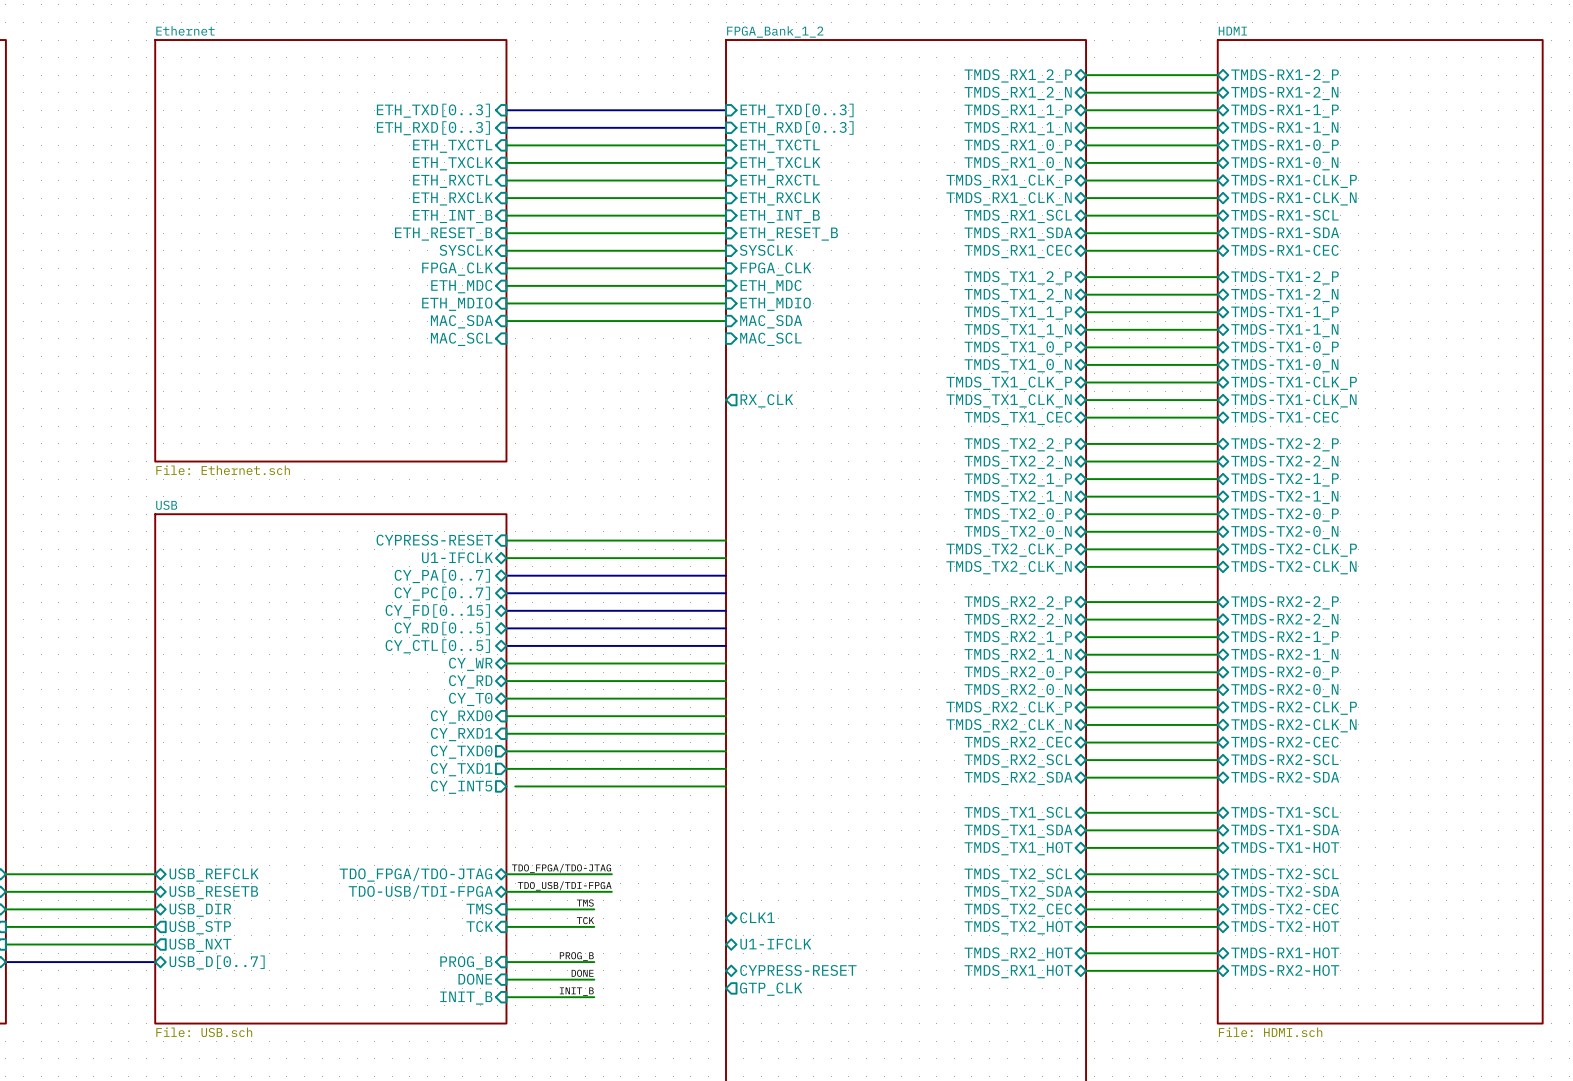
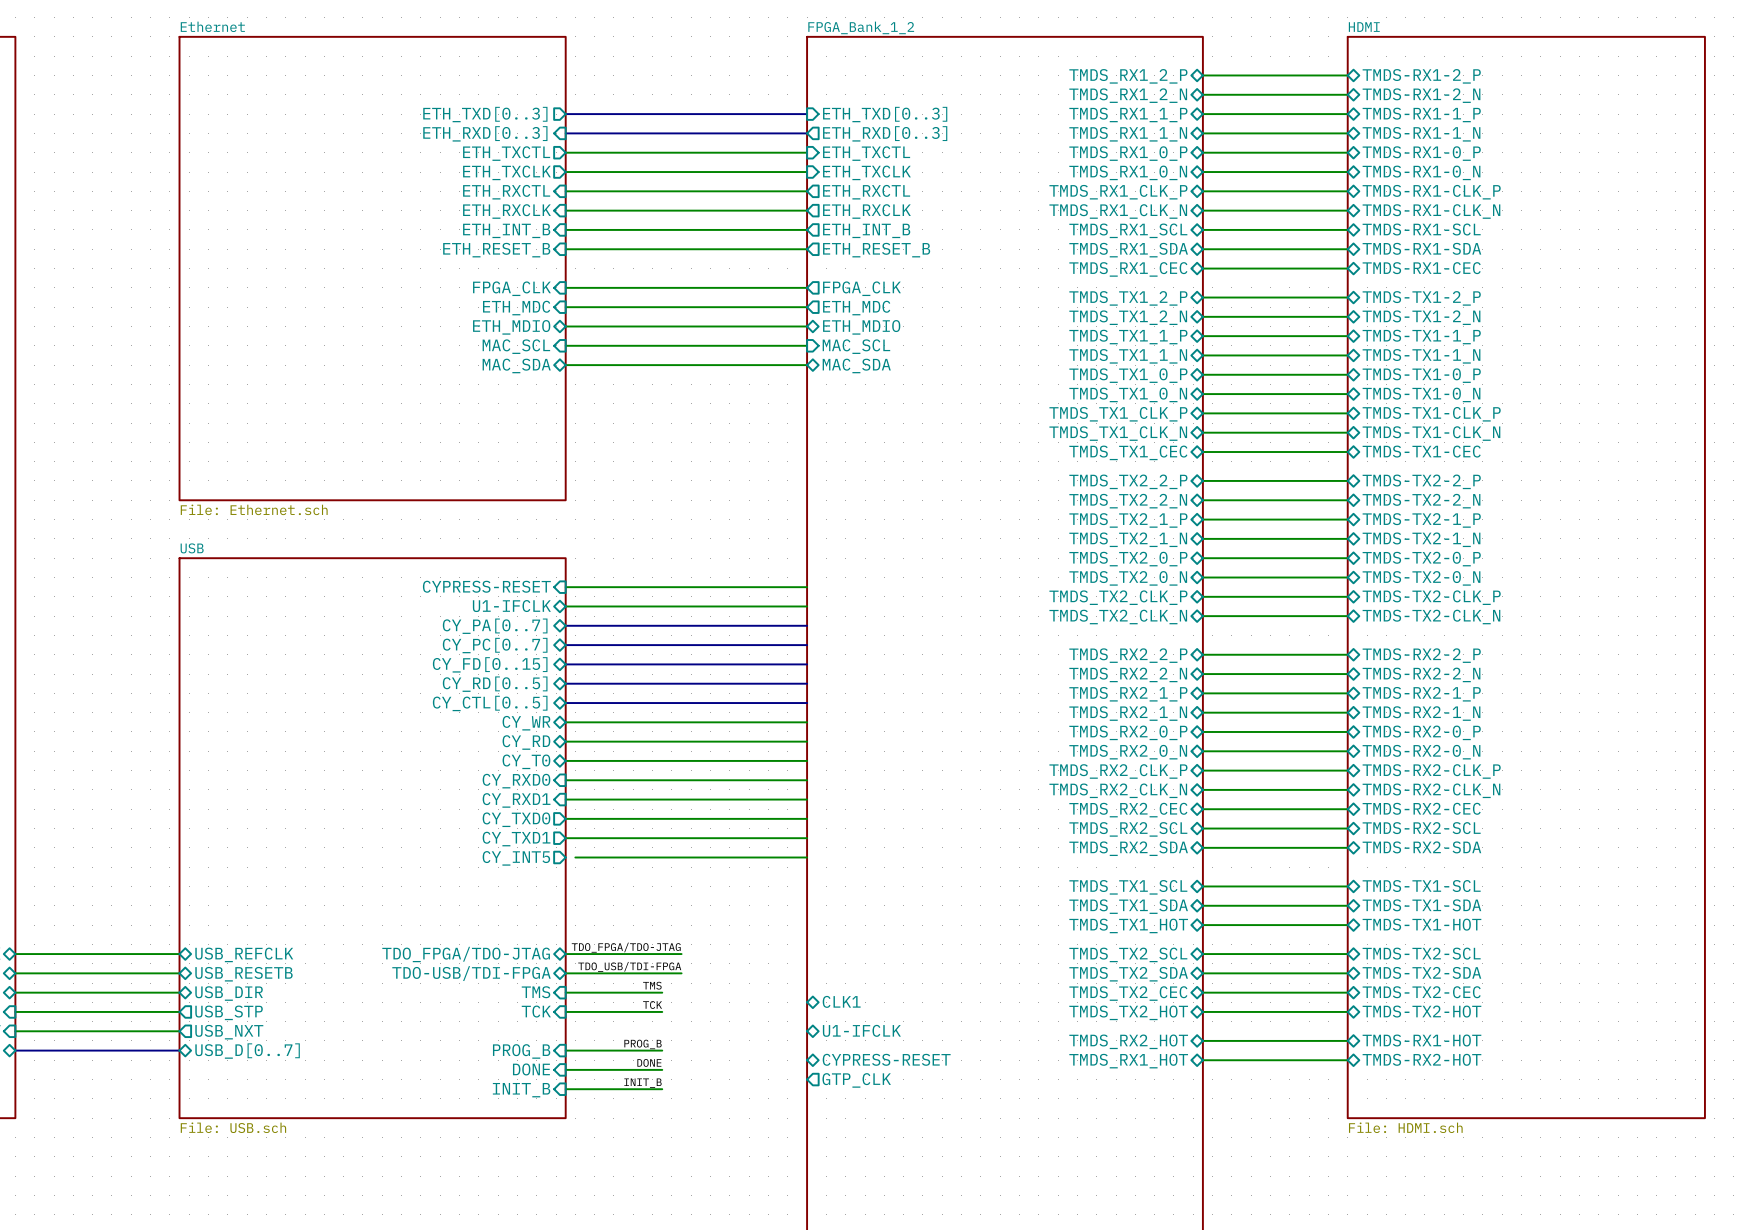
sheet pin shape: input (433, 110) -> output (485, 114)
sheet pin shape: input (797, 128) -> output (885, 133)
sheet pin shape: input (452, 146) -> output (506, 153)
sheet pin shape: input (453, 163) -> output (506, 172)
sheet pin shape: input (780, 181) -> output (866, 192)
sheet pin shape: input (780, 198) -> output (866, 211)
sheet pin shape: input (780, 216) -> output (866, 230)
sheet pin shape: input (789, 234) -> output (876, 250)
sheet pin: SYSCLK (466, 250) -> none
wire: (506, 250) (726, 250) -> (565, 365) (807, 365)
sheet pin: SYSCLK (766, 250) -> none
sheet pin shape: input (775, 269) -> output (861, 288)
sheet pin shape: input (771, 286) -> output (856, 308)
sheet pin shape: input (457, 304) -> bidirectional (511, 327)
sheet pin shape: input (775, 304) -> bidirectional (861, 327)
sheet pin: MAC_SDA (461, 321) -> MAC_SCL (516, 346)
sheet pin: MAC_SDA (771, 321) -> MAC_SCL (856, 346)
sheet pin shape: input (461, 339) -> bidirectional (516, 365)
sheet pin: MAC_SCL (461, 339) -> MAC_SDA (516, 365)
sheet pin shape: input (770, 339) -> bidirectional (856, 365)
sheet pin: MAC_SCL (770, 339) -> MAC_SDA (856, 365)
sheet pin: RX_CLK (766, 400) -> none

